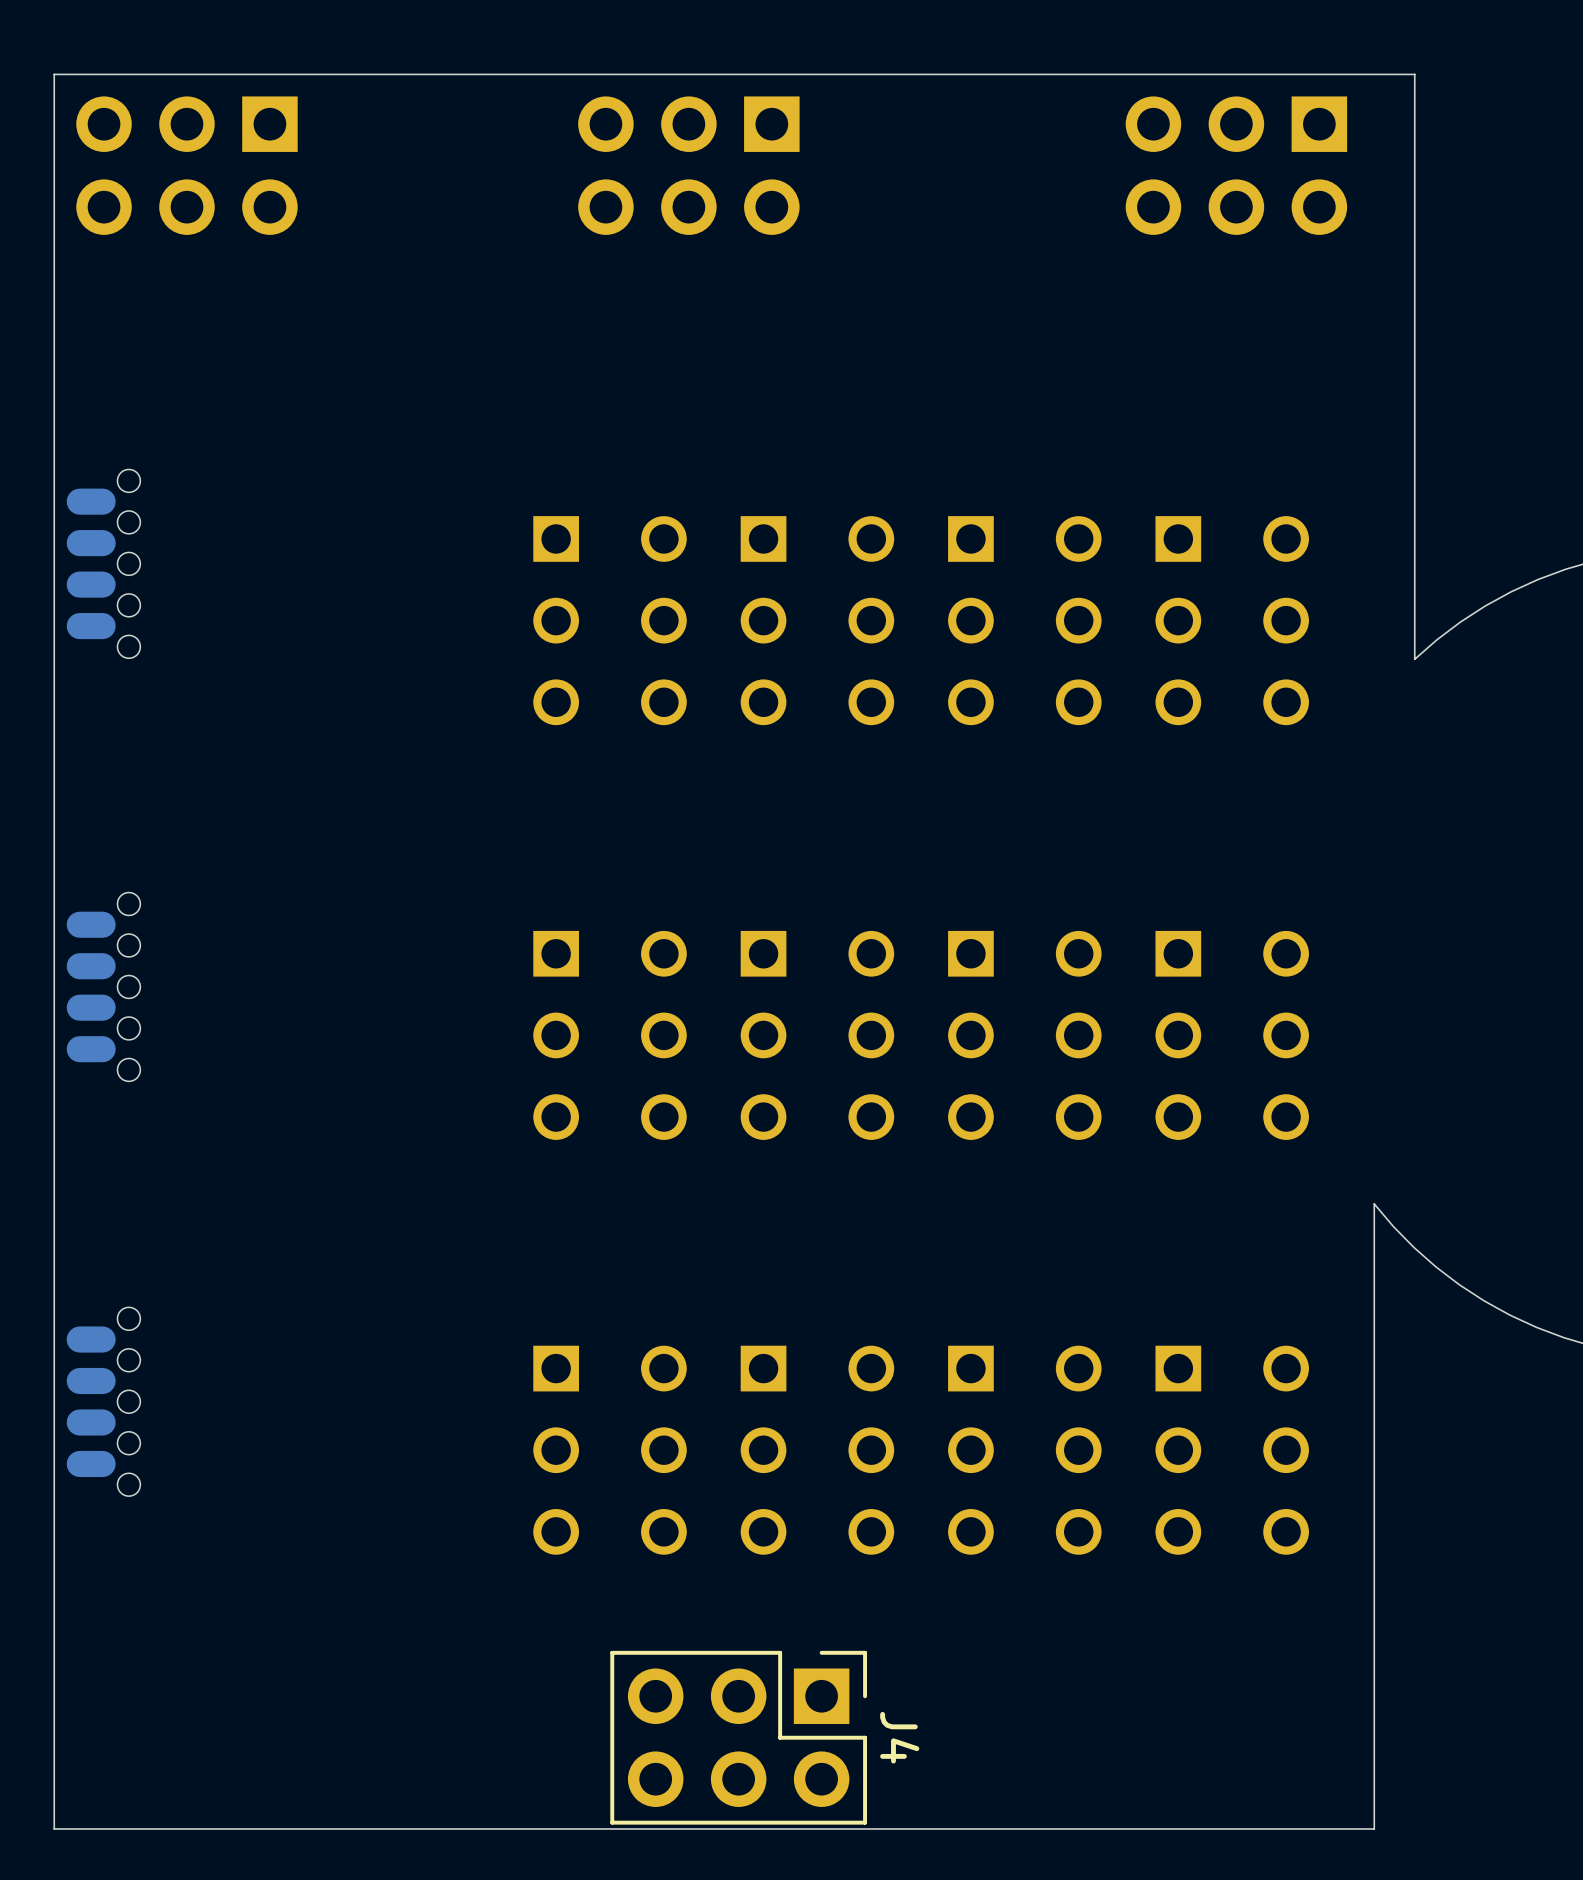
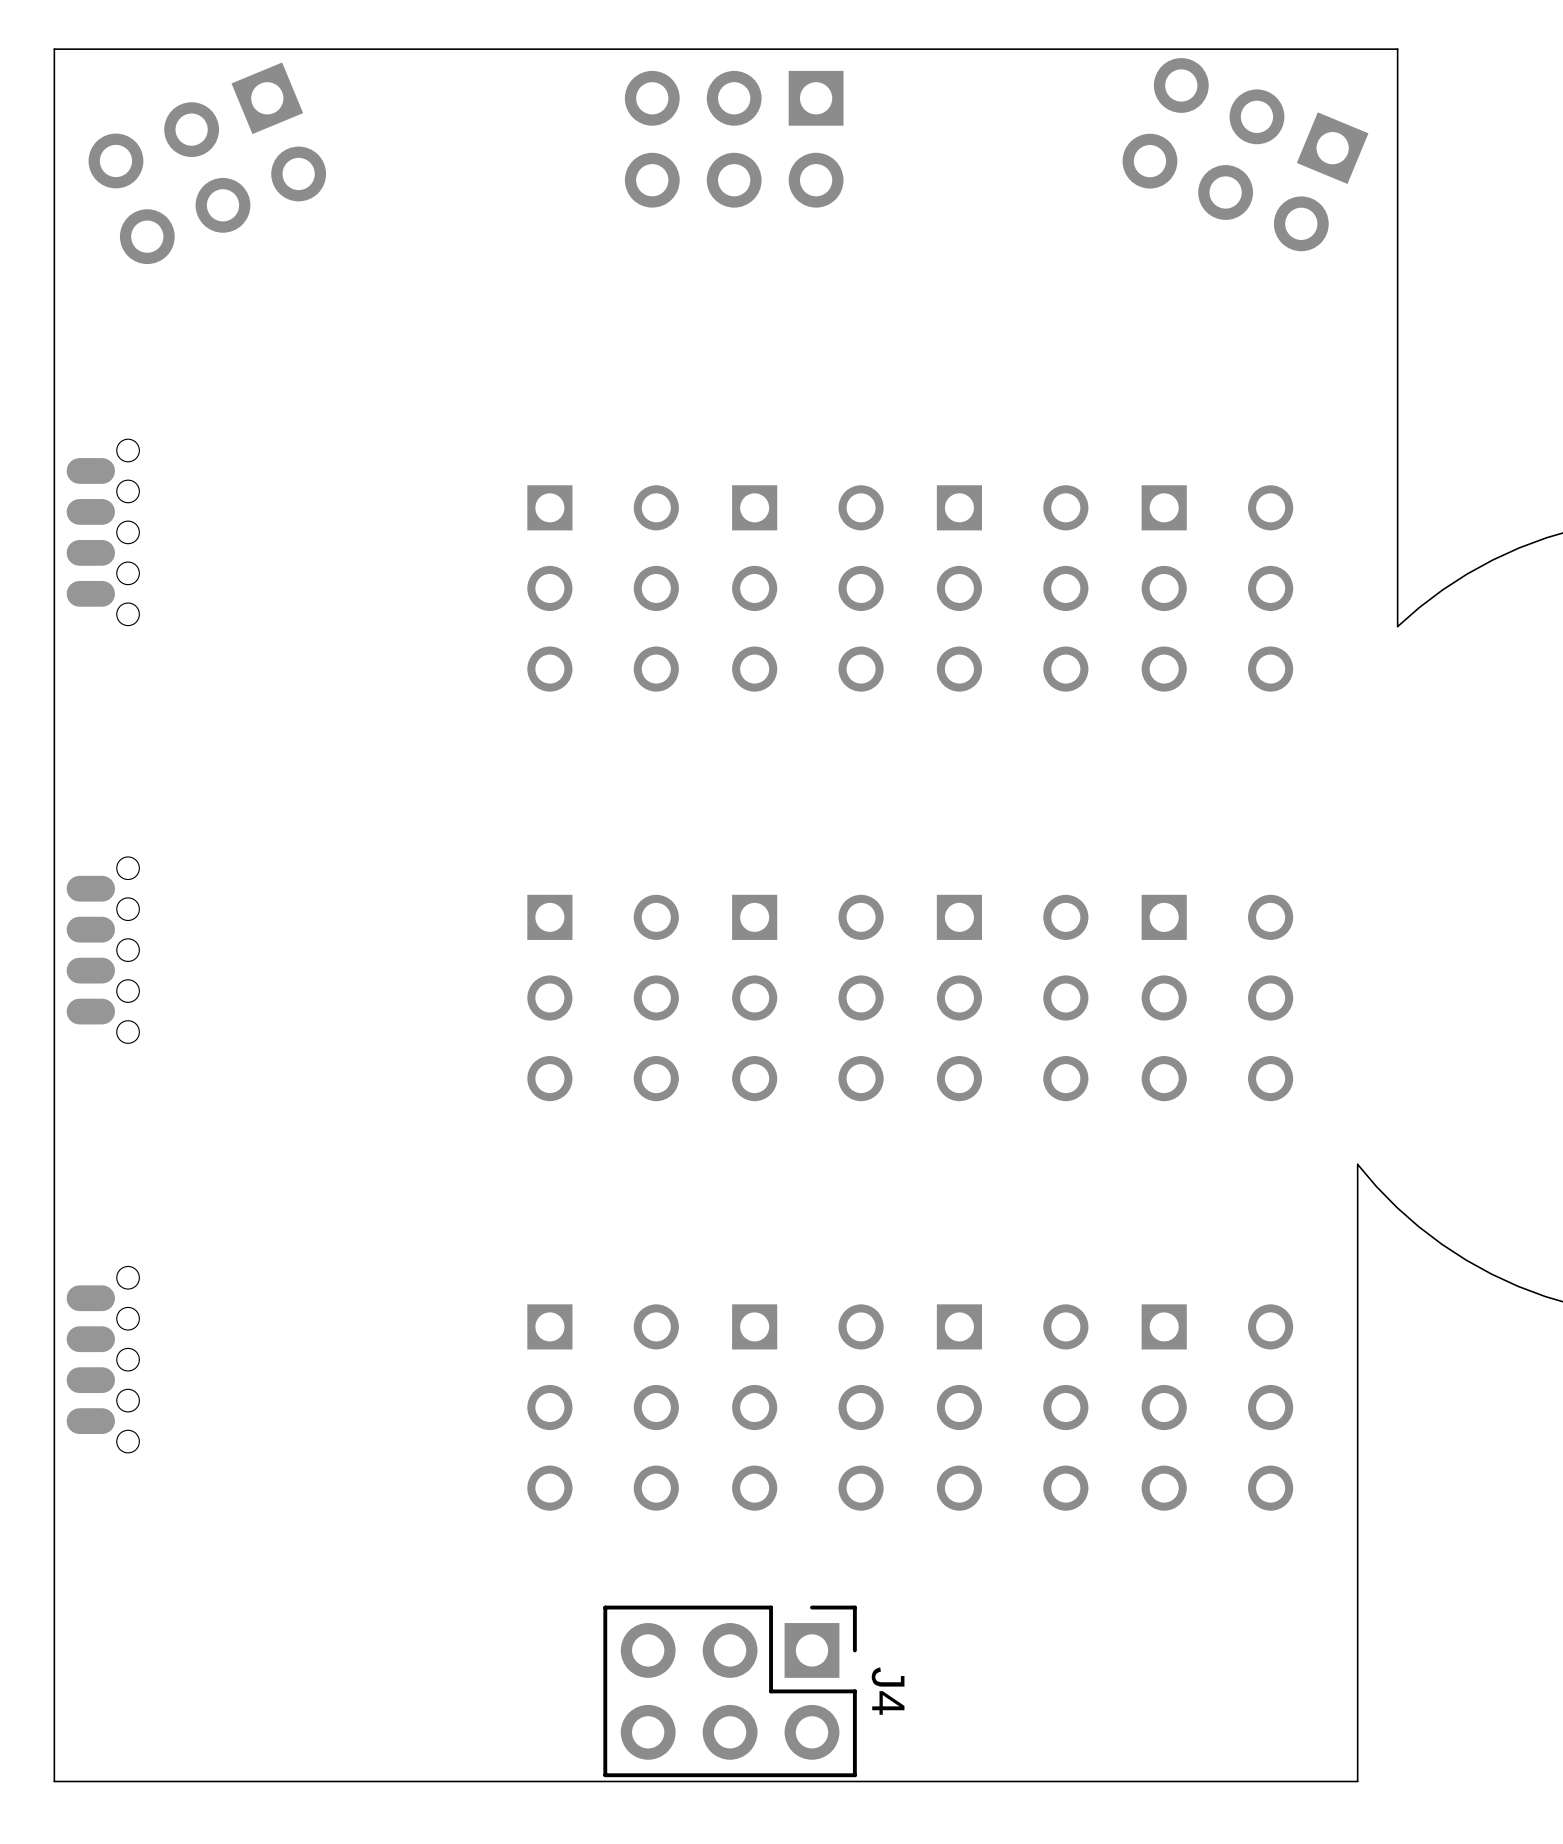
part: (186, 165) -> none
part position: (688, 165) -> (734, 139)
part rotation: 0° (1236, 165) -> 22.5° clockwise (1245, 154)
part: none -> (207, 163)

